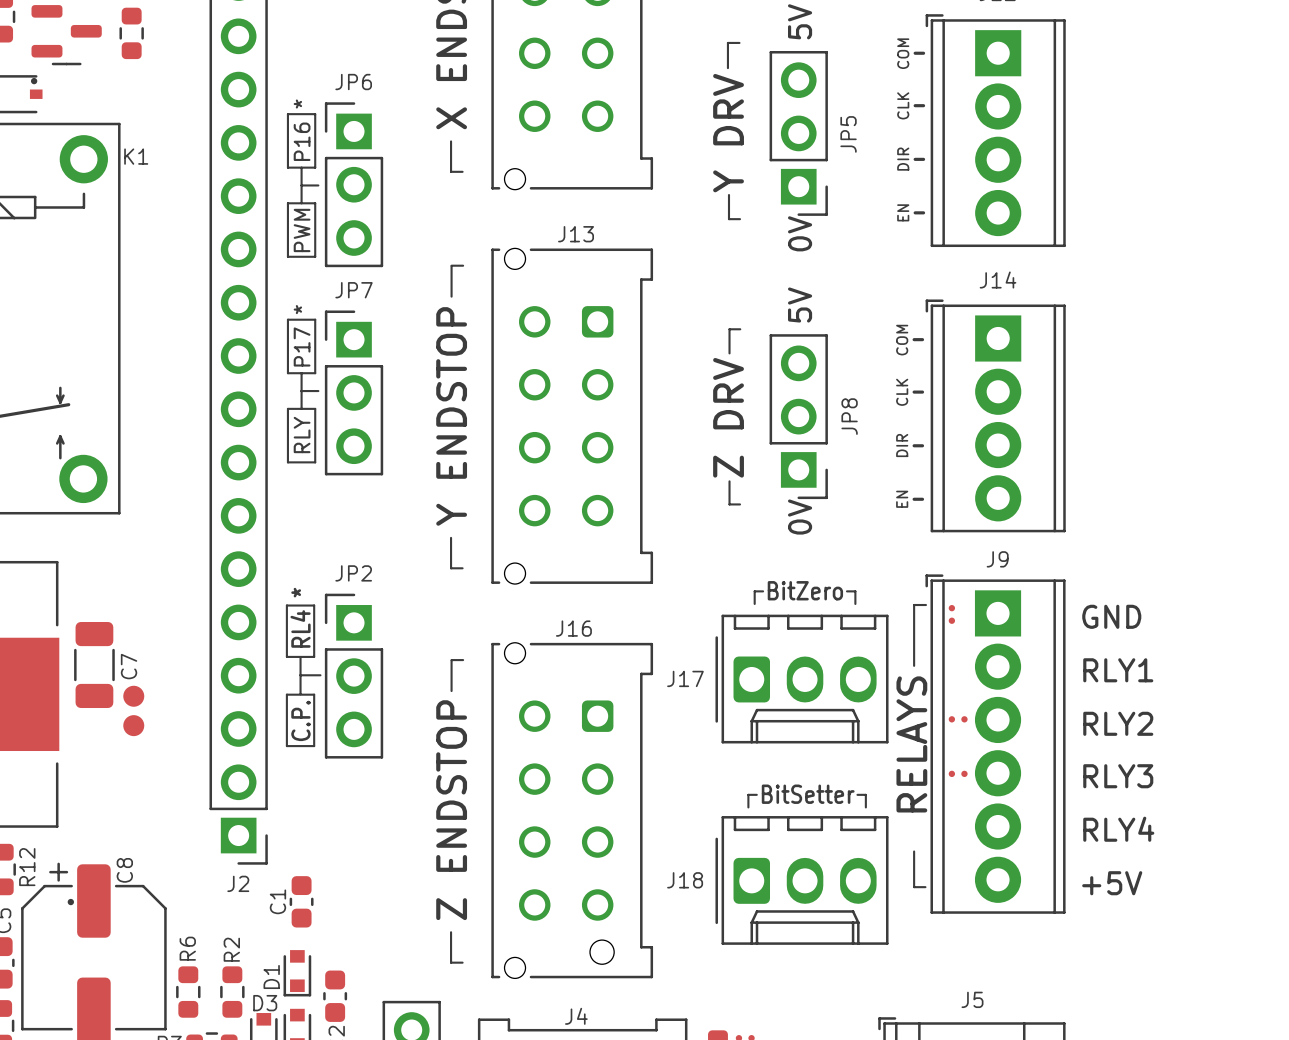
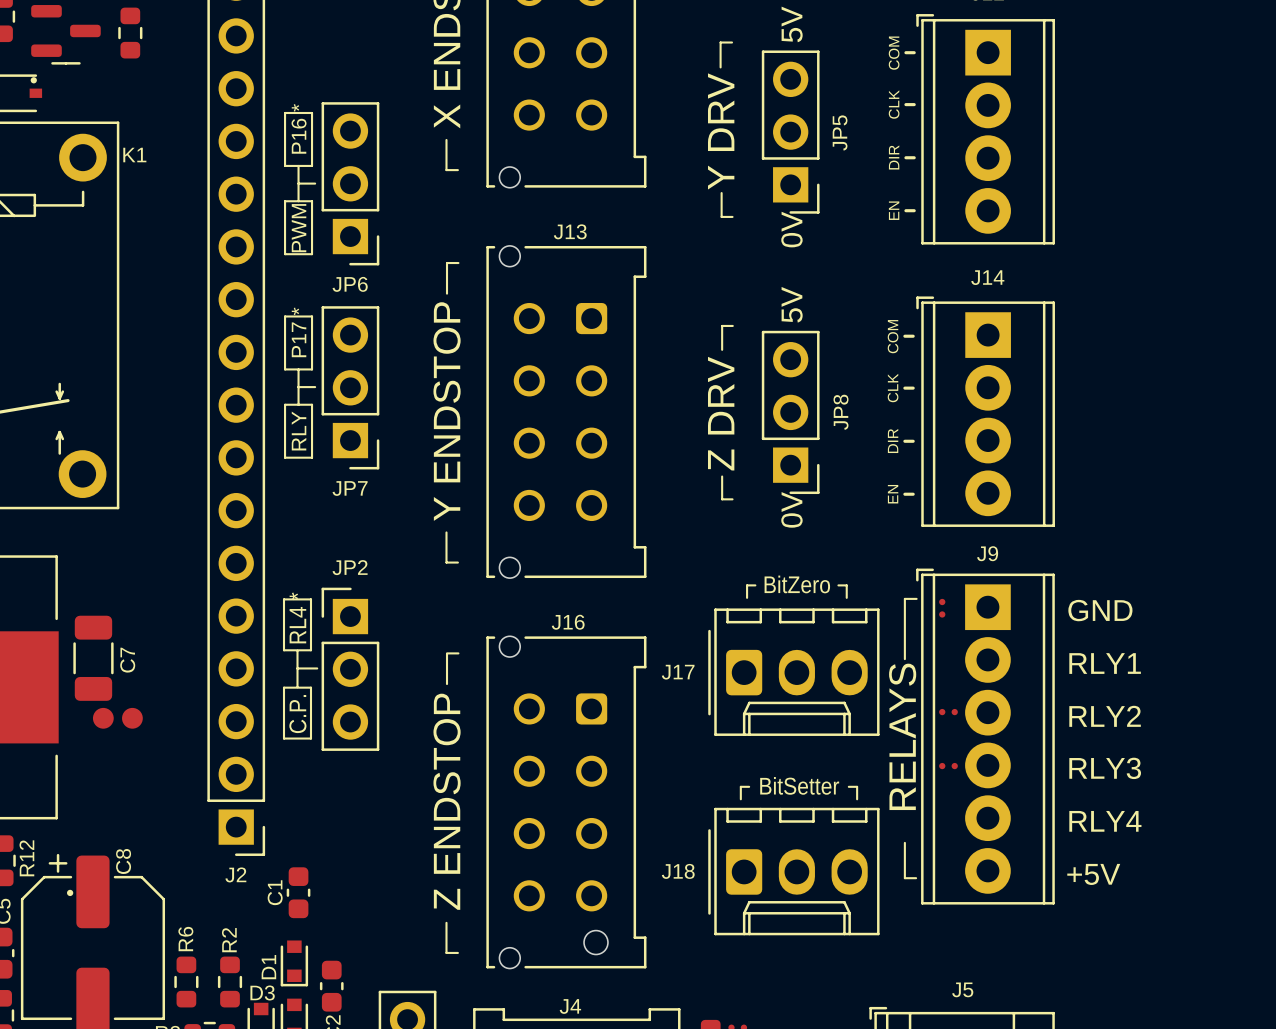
JP6 rotation: 0° (354, 184) -> 180° (350, 183)
JP7 rotation: 0° (354, 392) -> 180° (350, 387)
part rotation: 0° (133, 710) -> 90° clockwise (117, 718)

